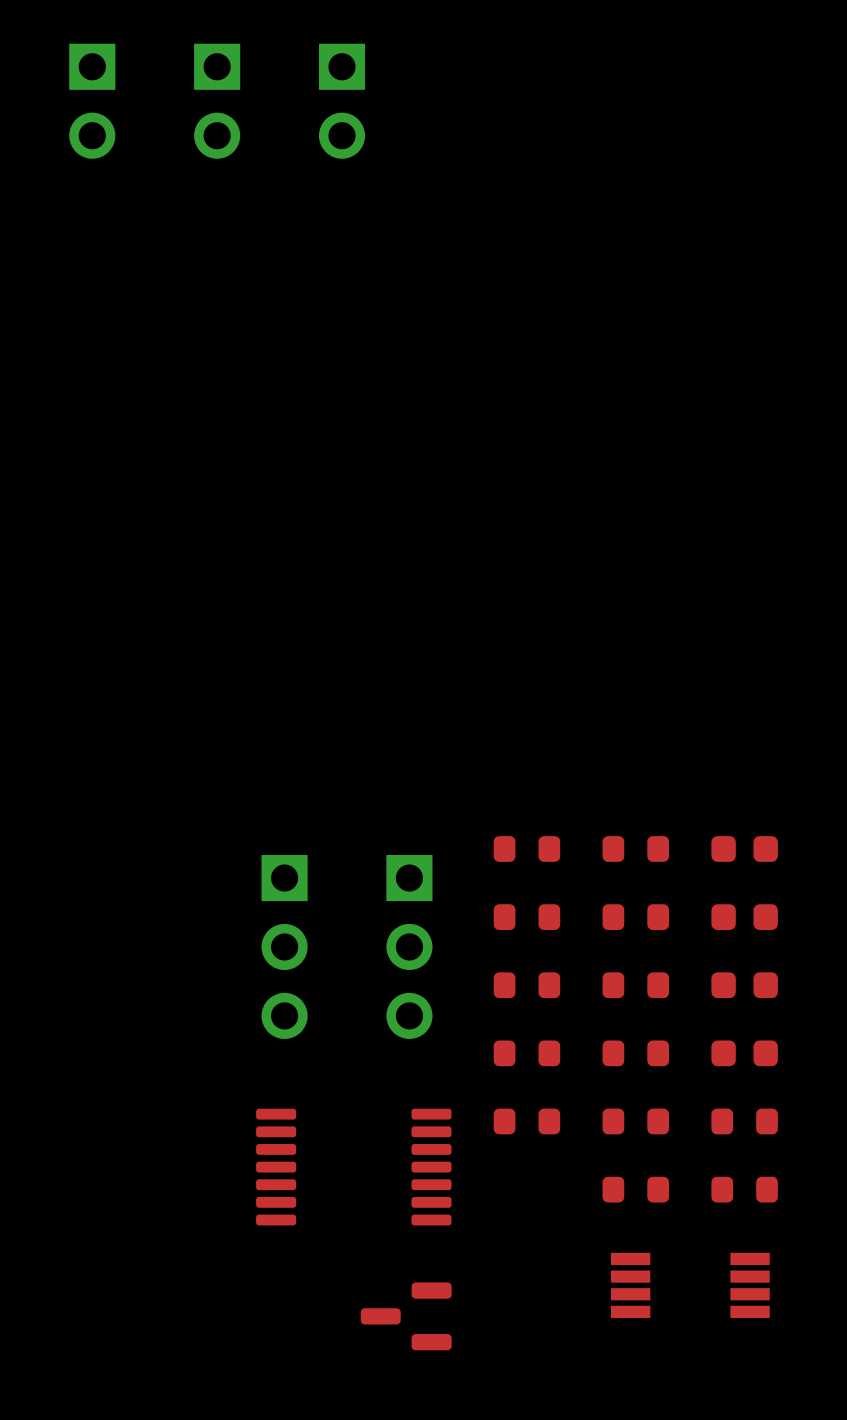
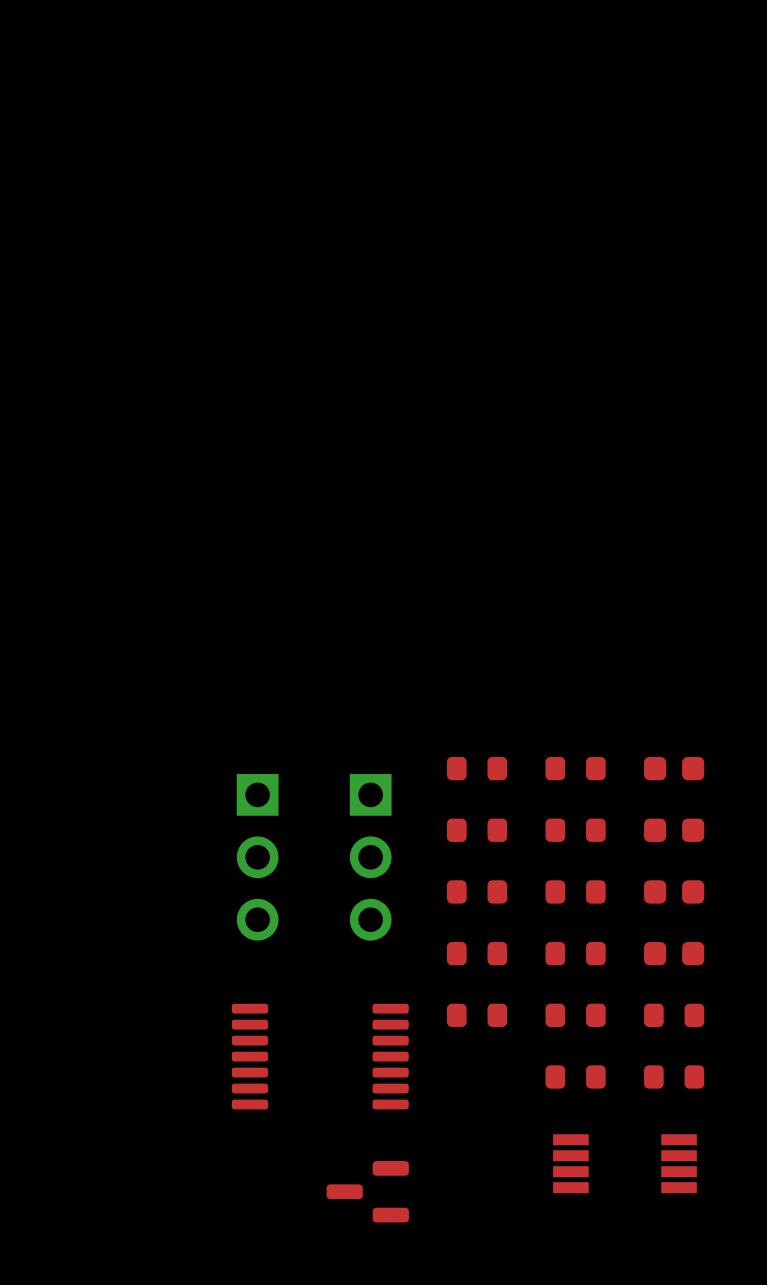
part: (92, 101) -> none
part: (217, 101) -> none
part: (342, 101) -> none

